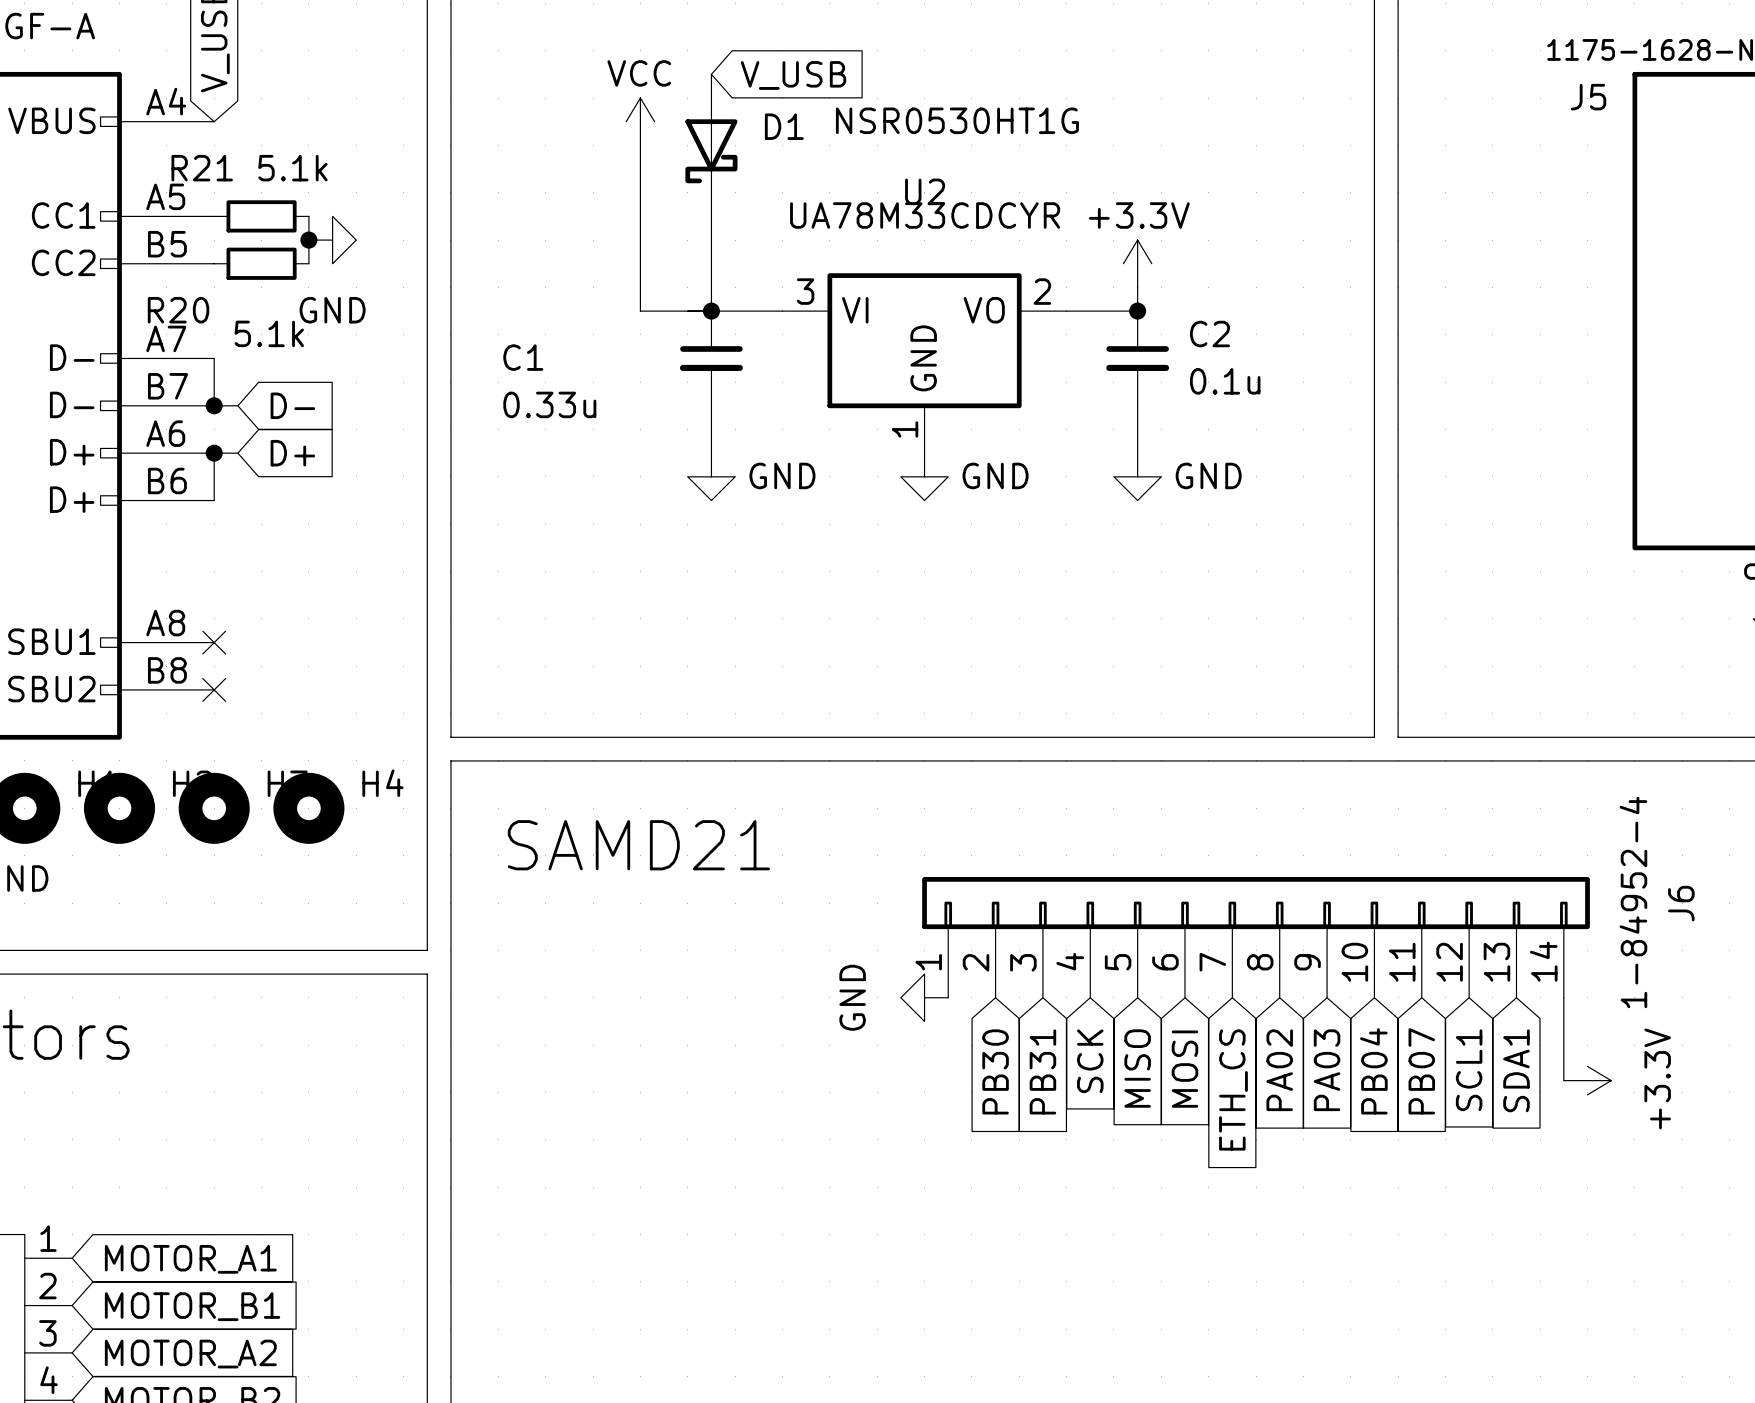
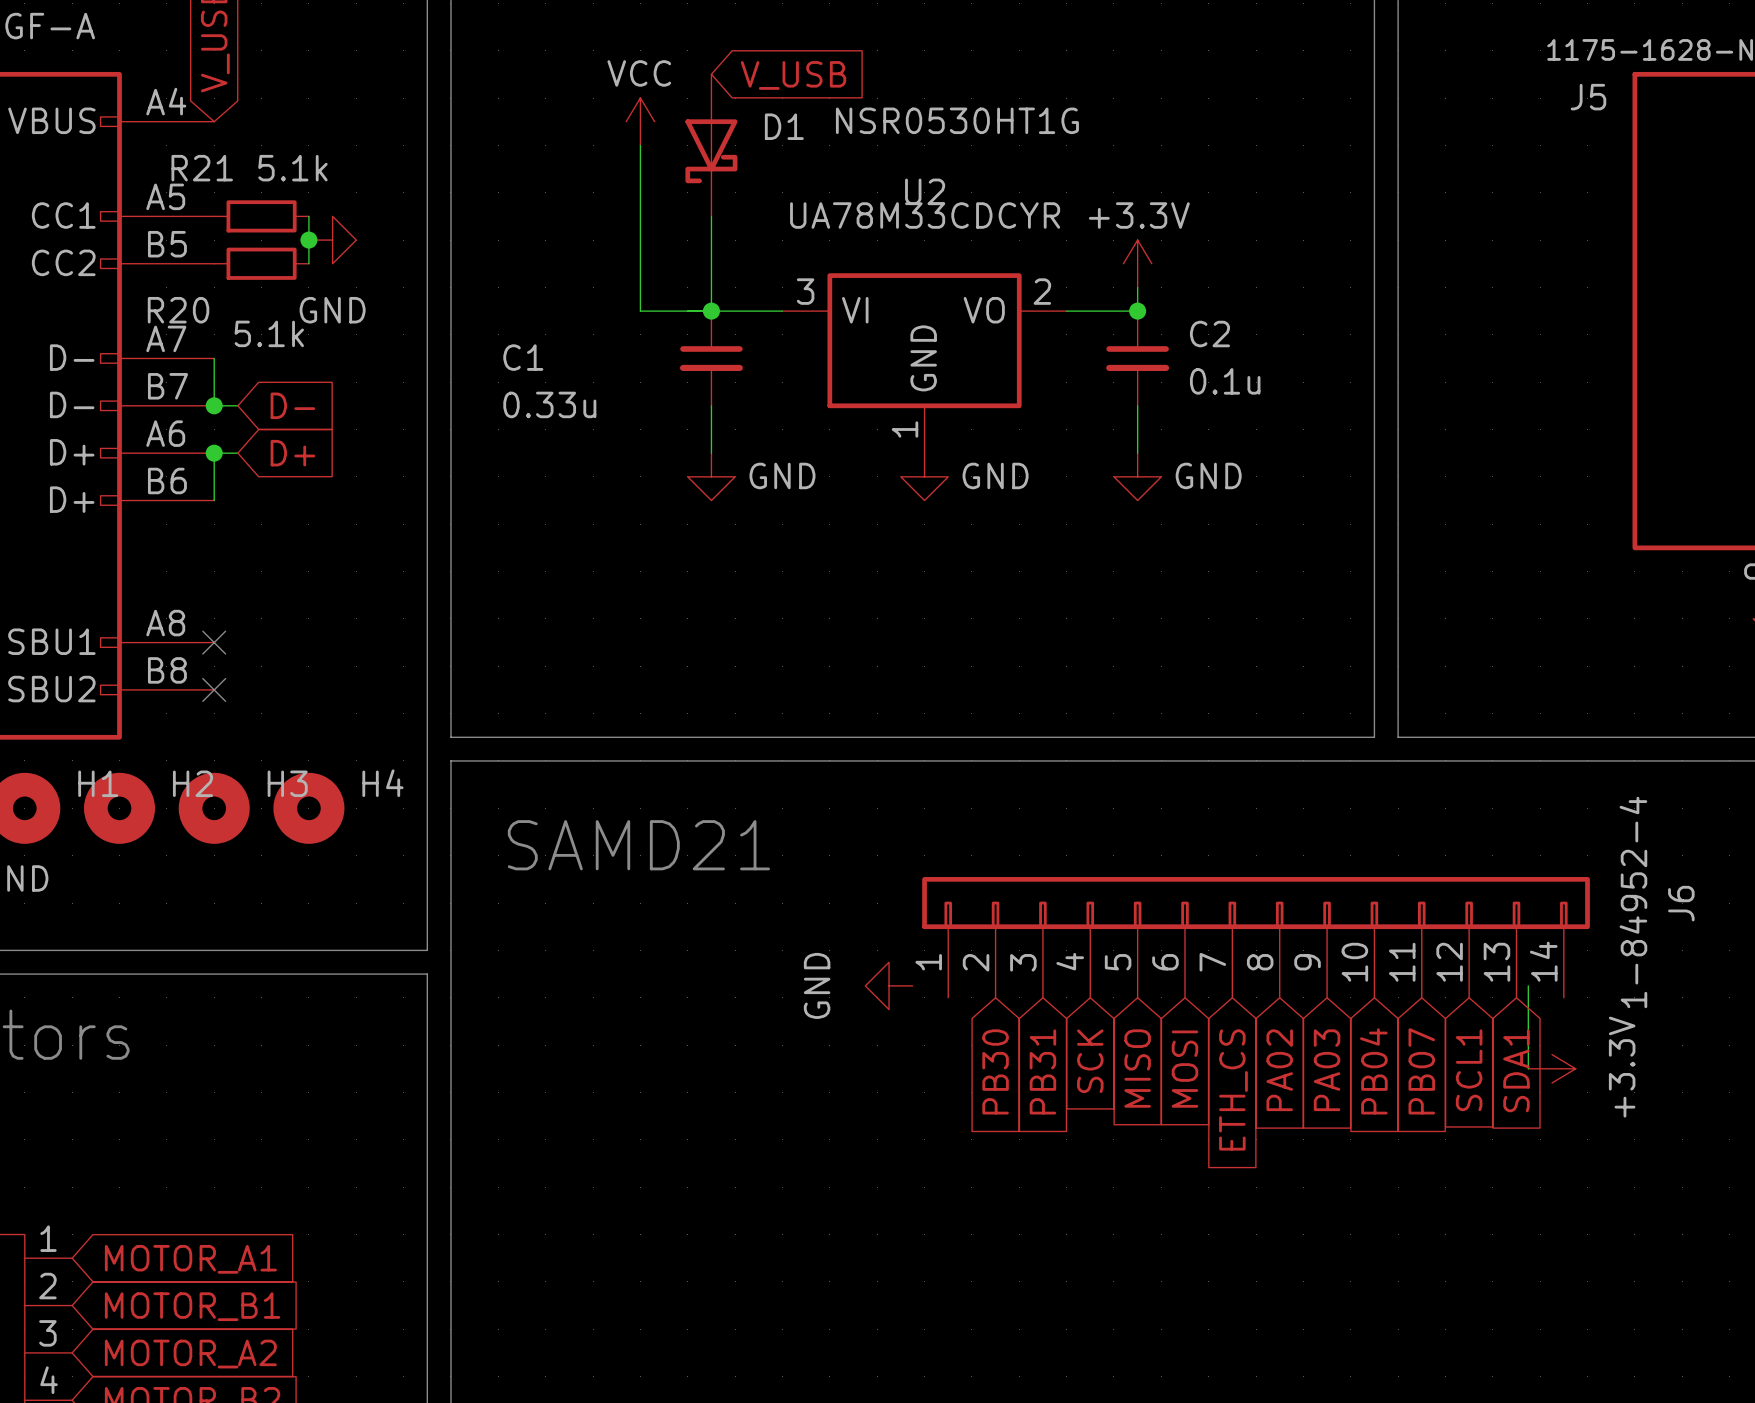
power symbol position: GND (924, 997) -> GND (889, 985)
wire: (1563, 997) (1563, 1080) -> (1528, 985) (1528, 1068)
power symbol position: +3.3V (1587, 1080) -> +3.3V (1552, 1068)

